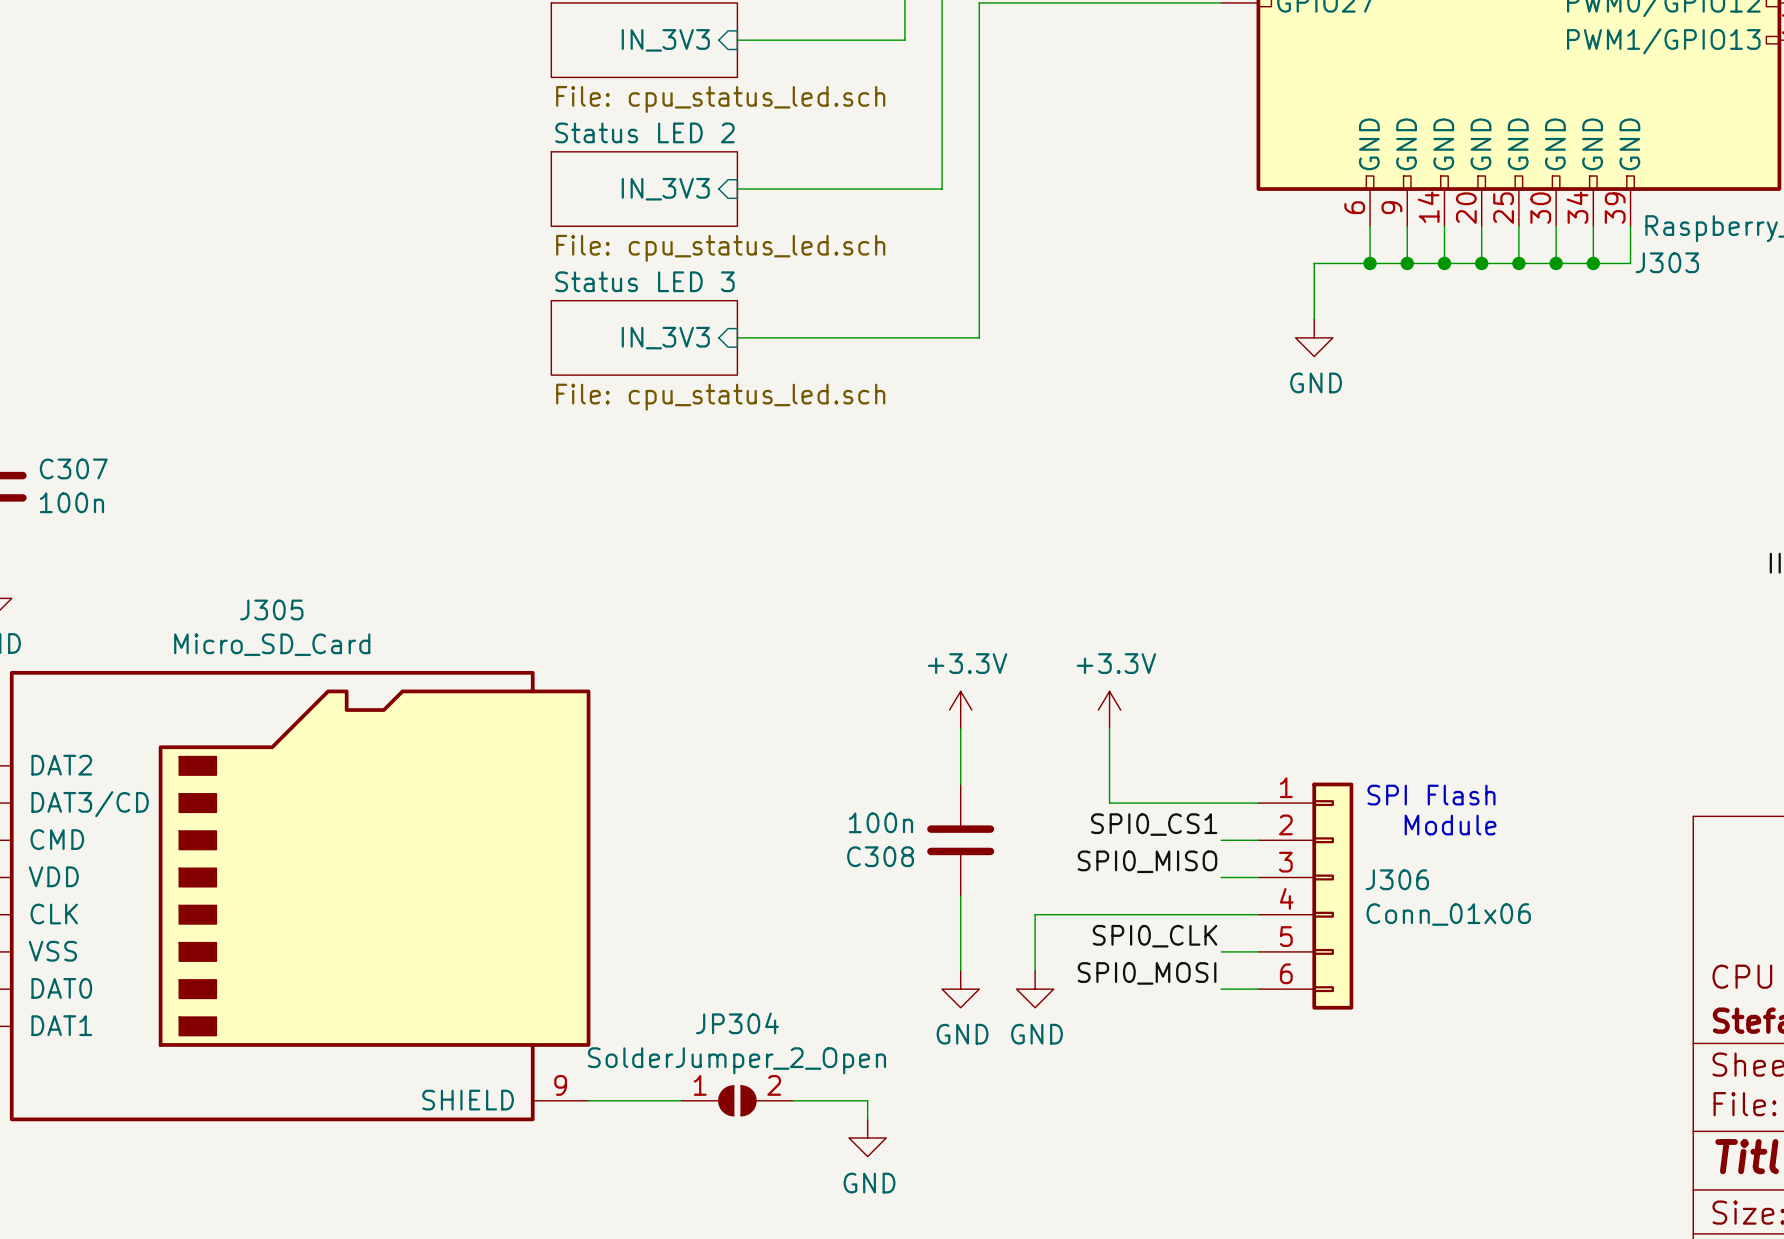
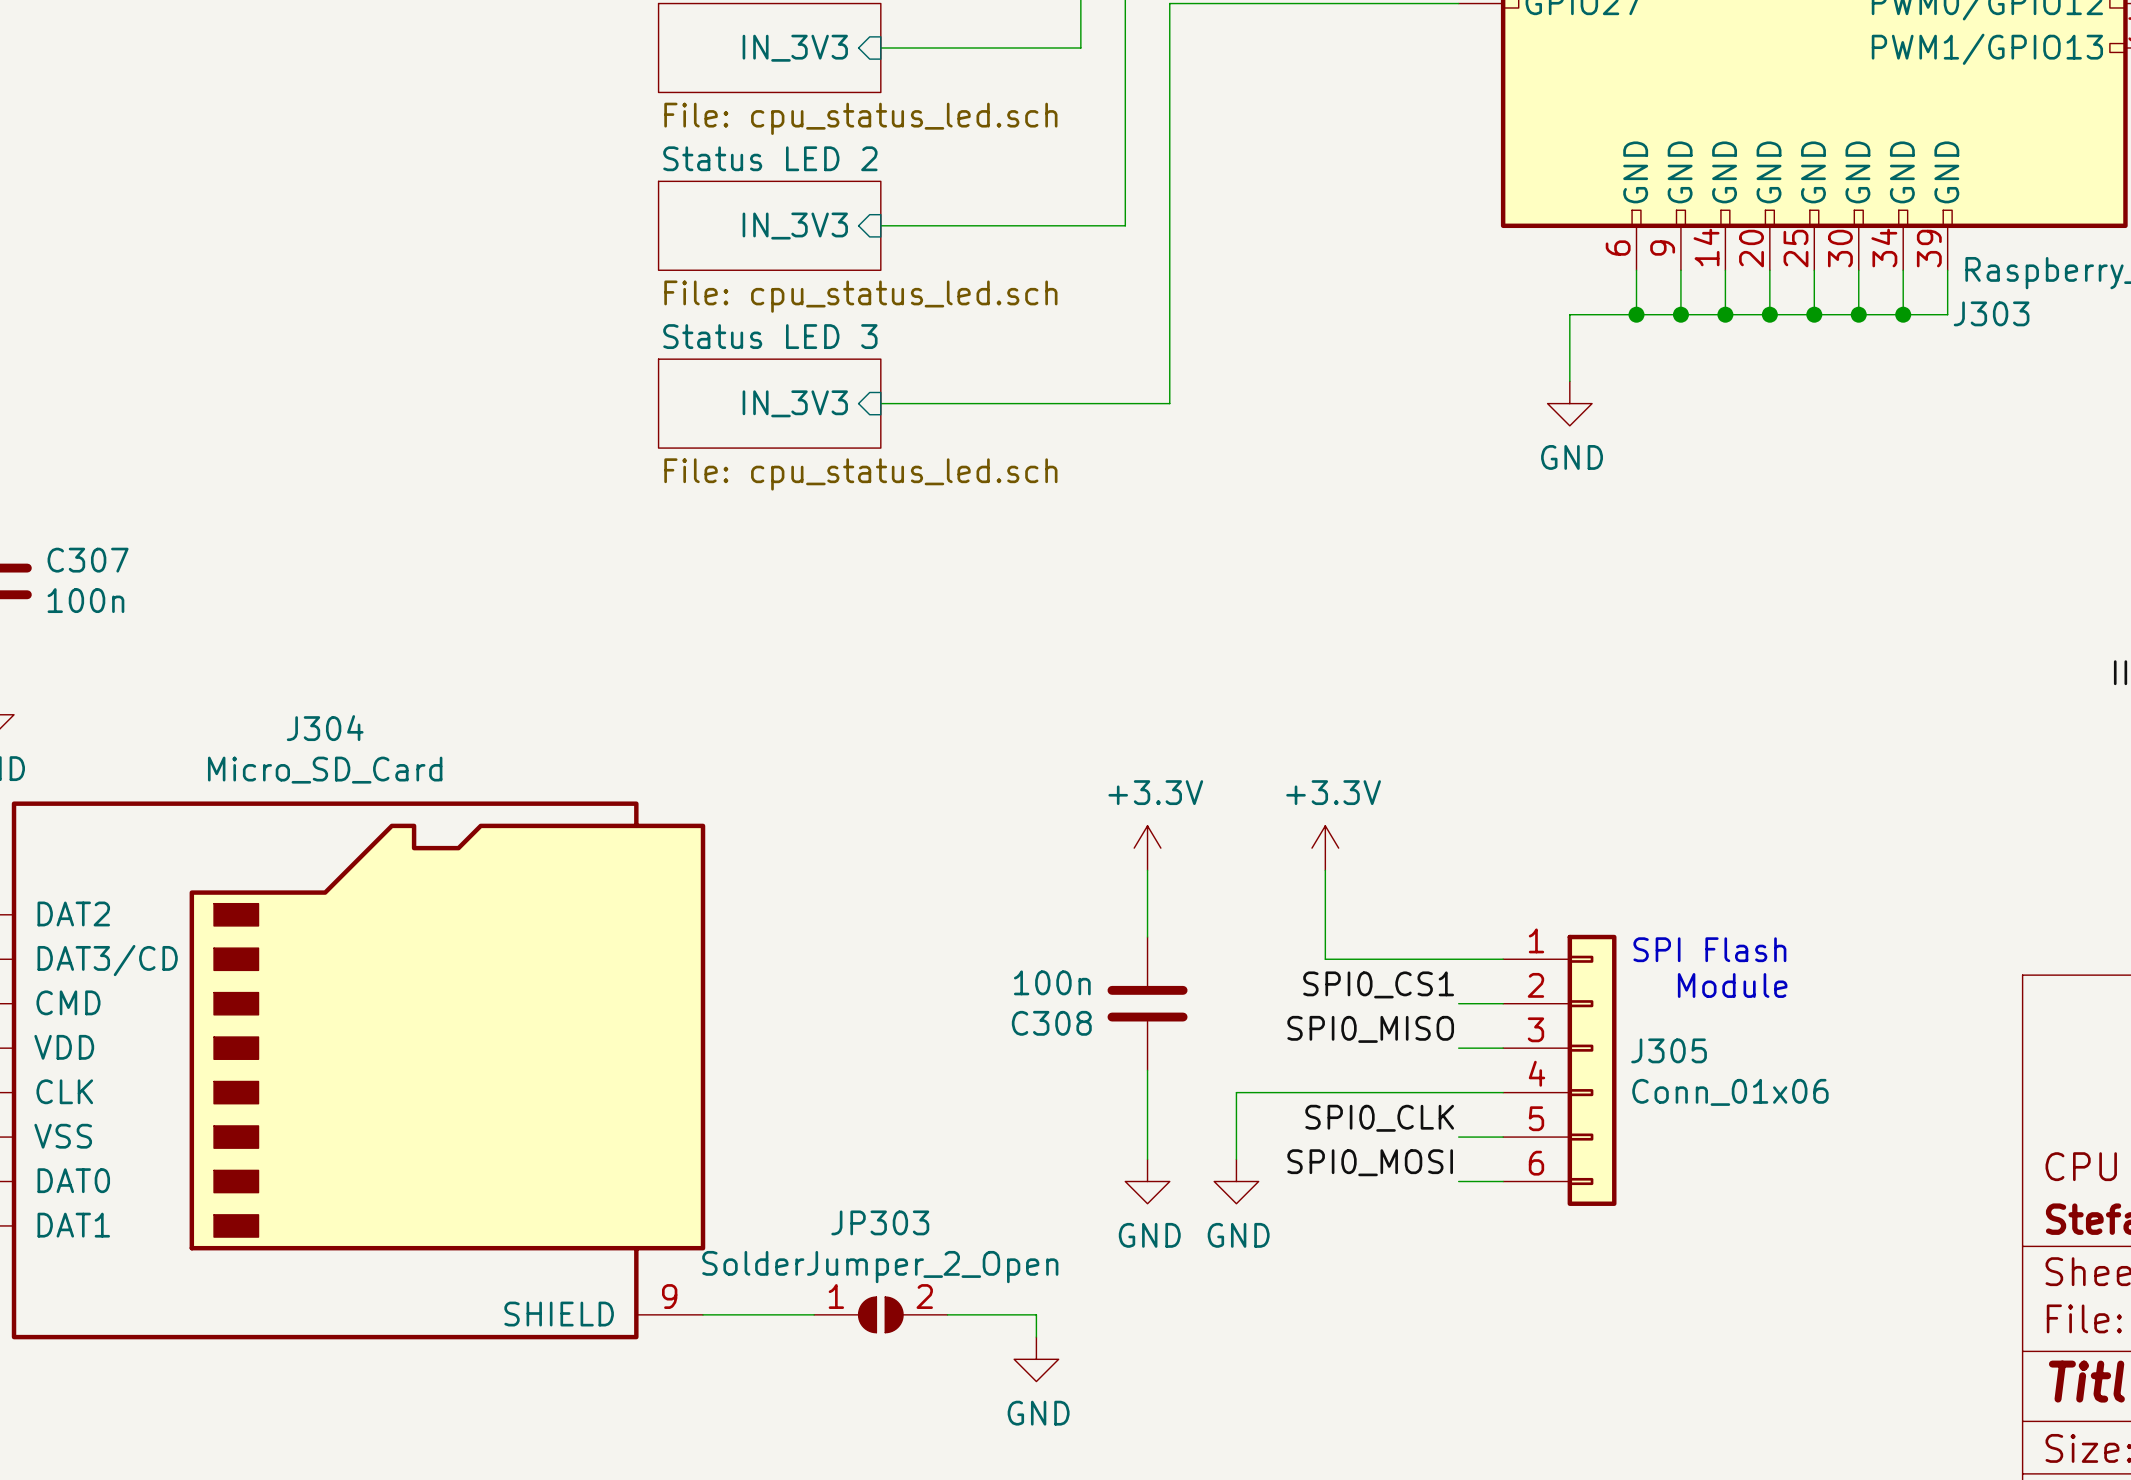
J305 name: J305 (271, 609) -> J304 (325, 728)
J306 name: J306 (1397, 879) -> J305 (1669, 1050)
JP304 name: JP304 (737, 1023) -> JP303 (880, 1222)

